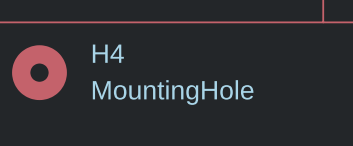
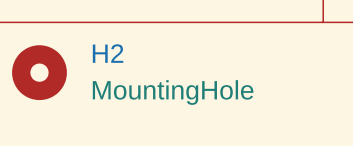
H4 name: H4 (108, 53) -> H2 (108, 53)

